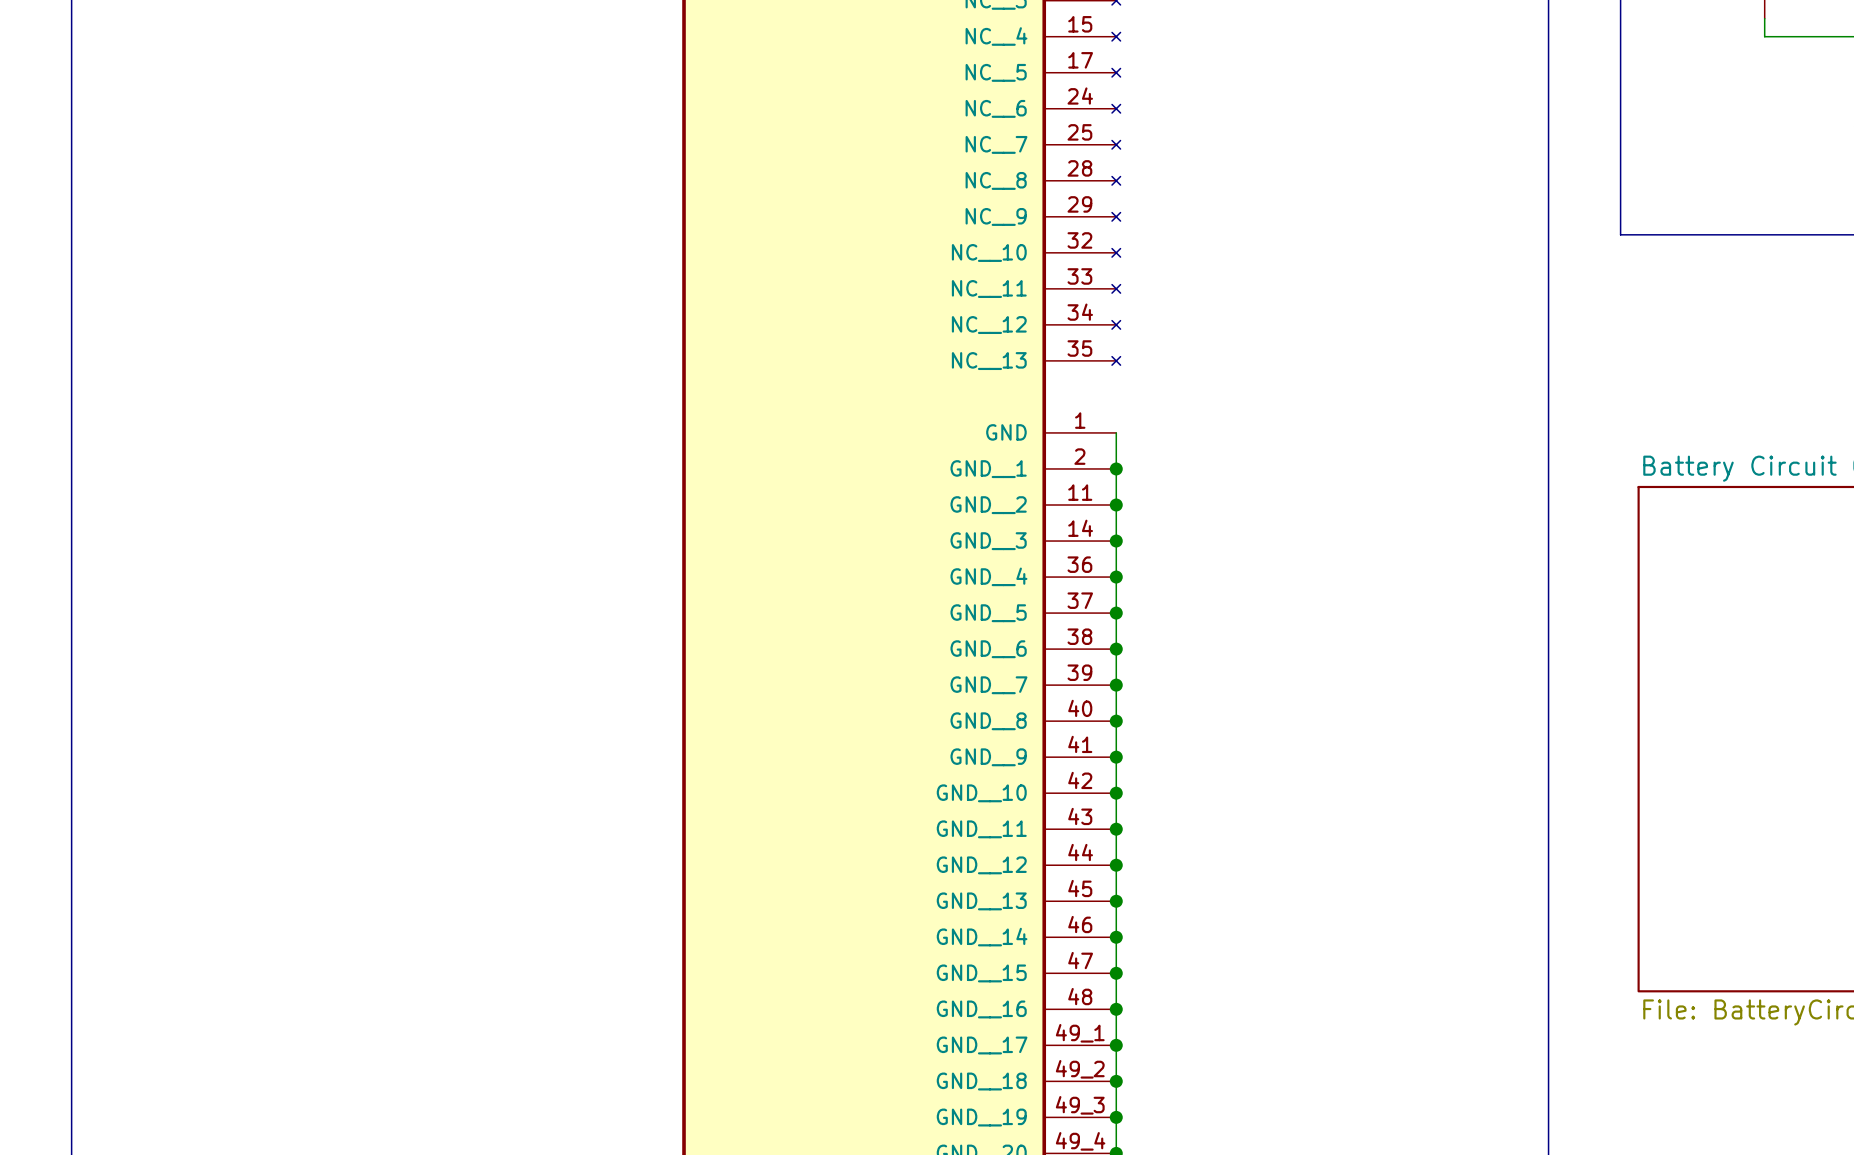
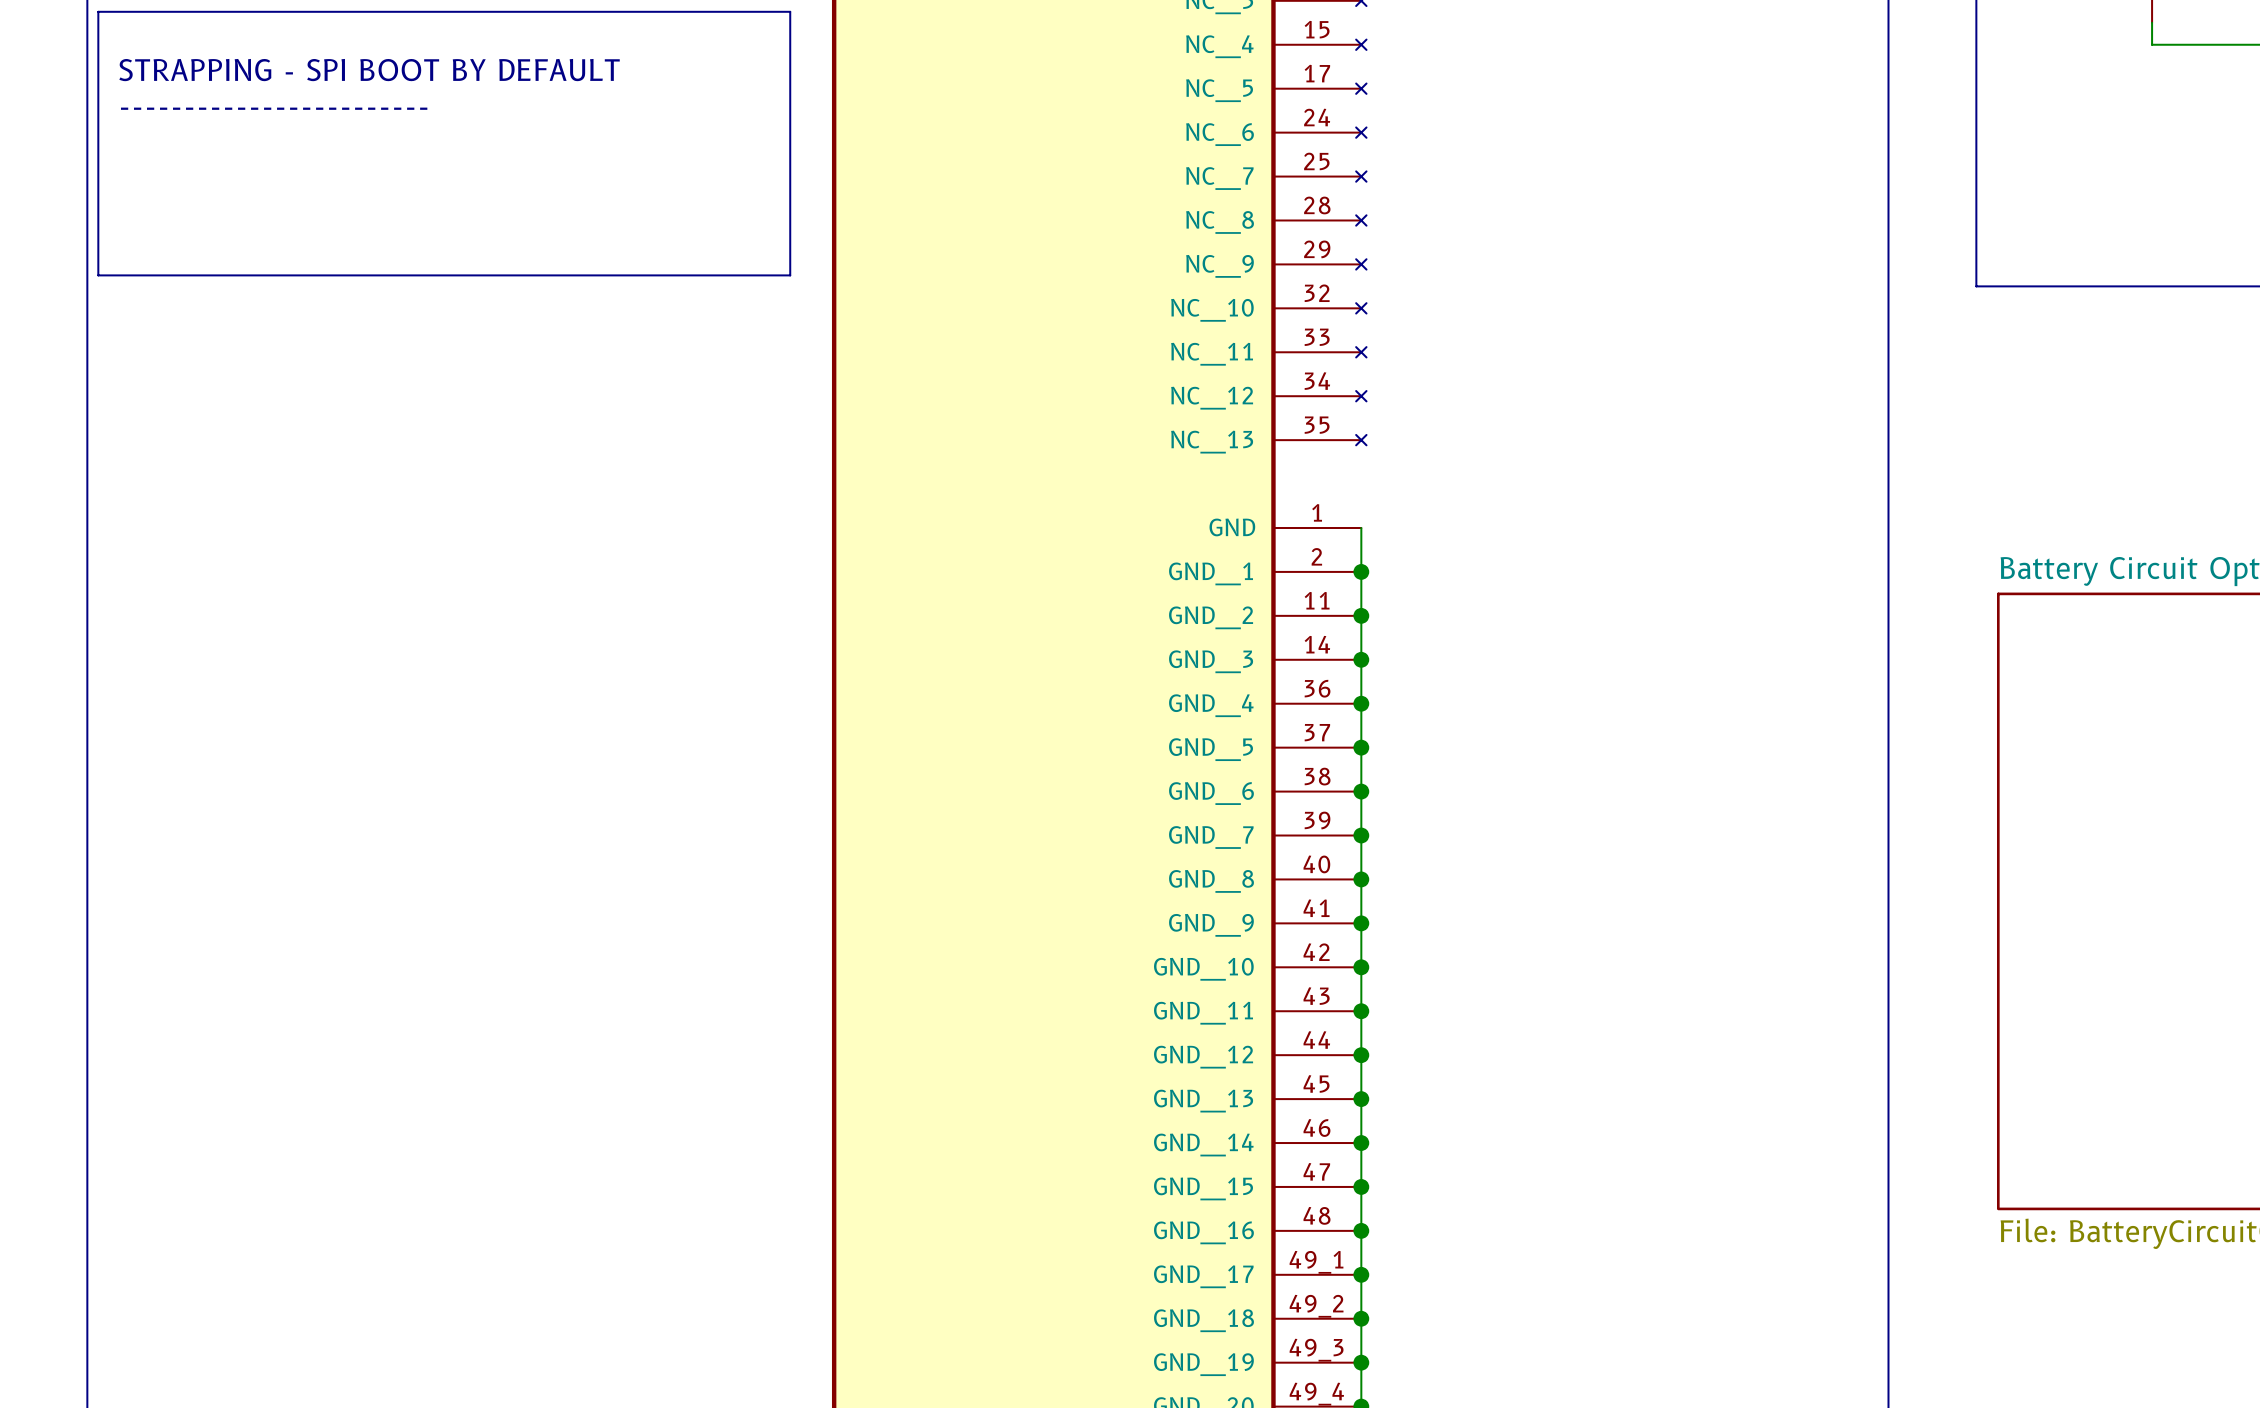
line: none -> (98, 11) (790, 11) (790, 275) (98, 275) (98, 11)
text: none -> STRAPPING - SPI BOOT BY DEFAULT (369, 70)
text: none -> ------------------------ (274, 108)

